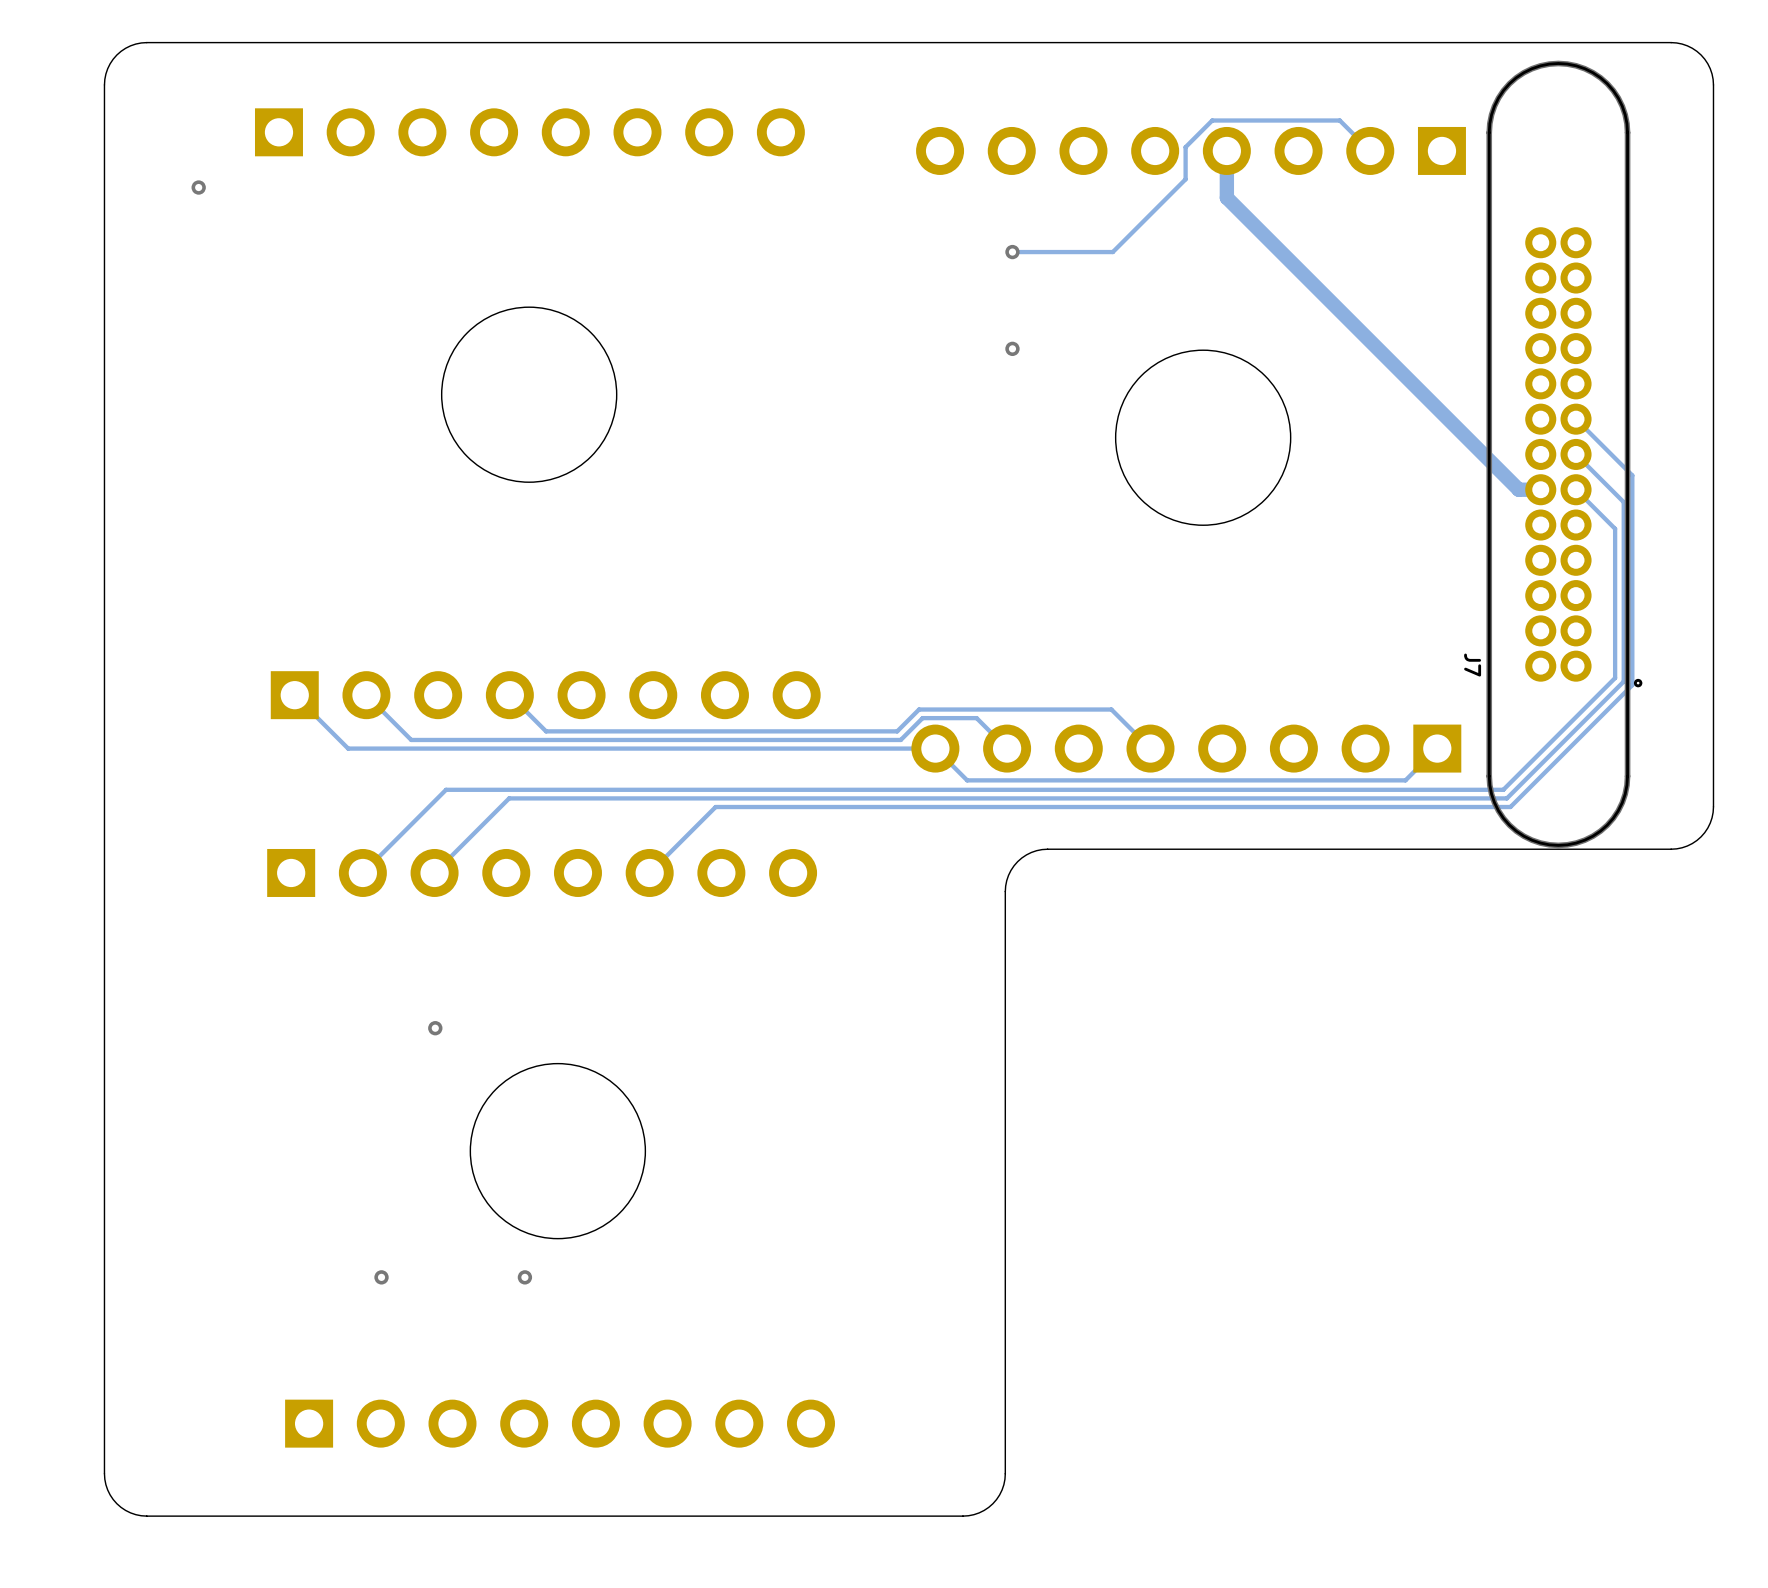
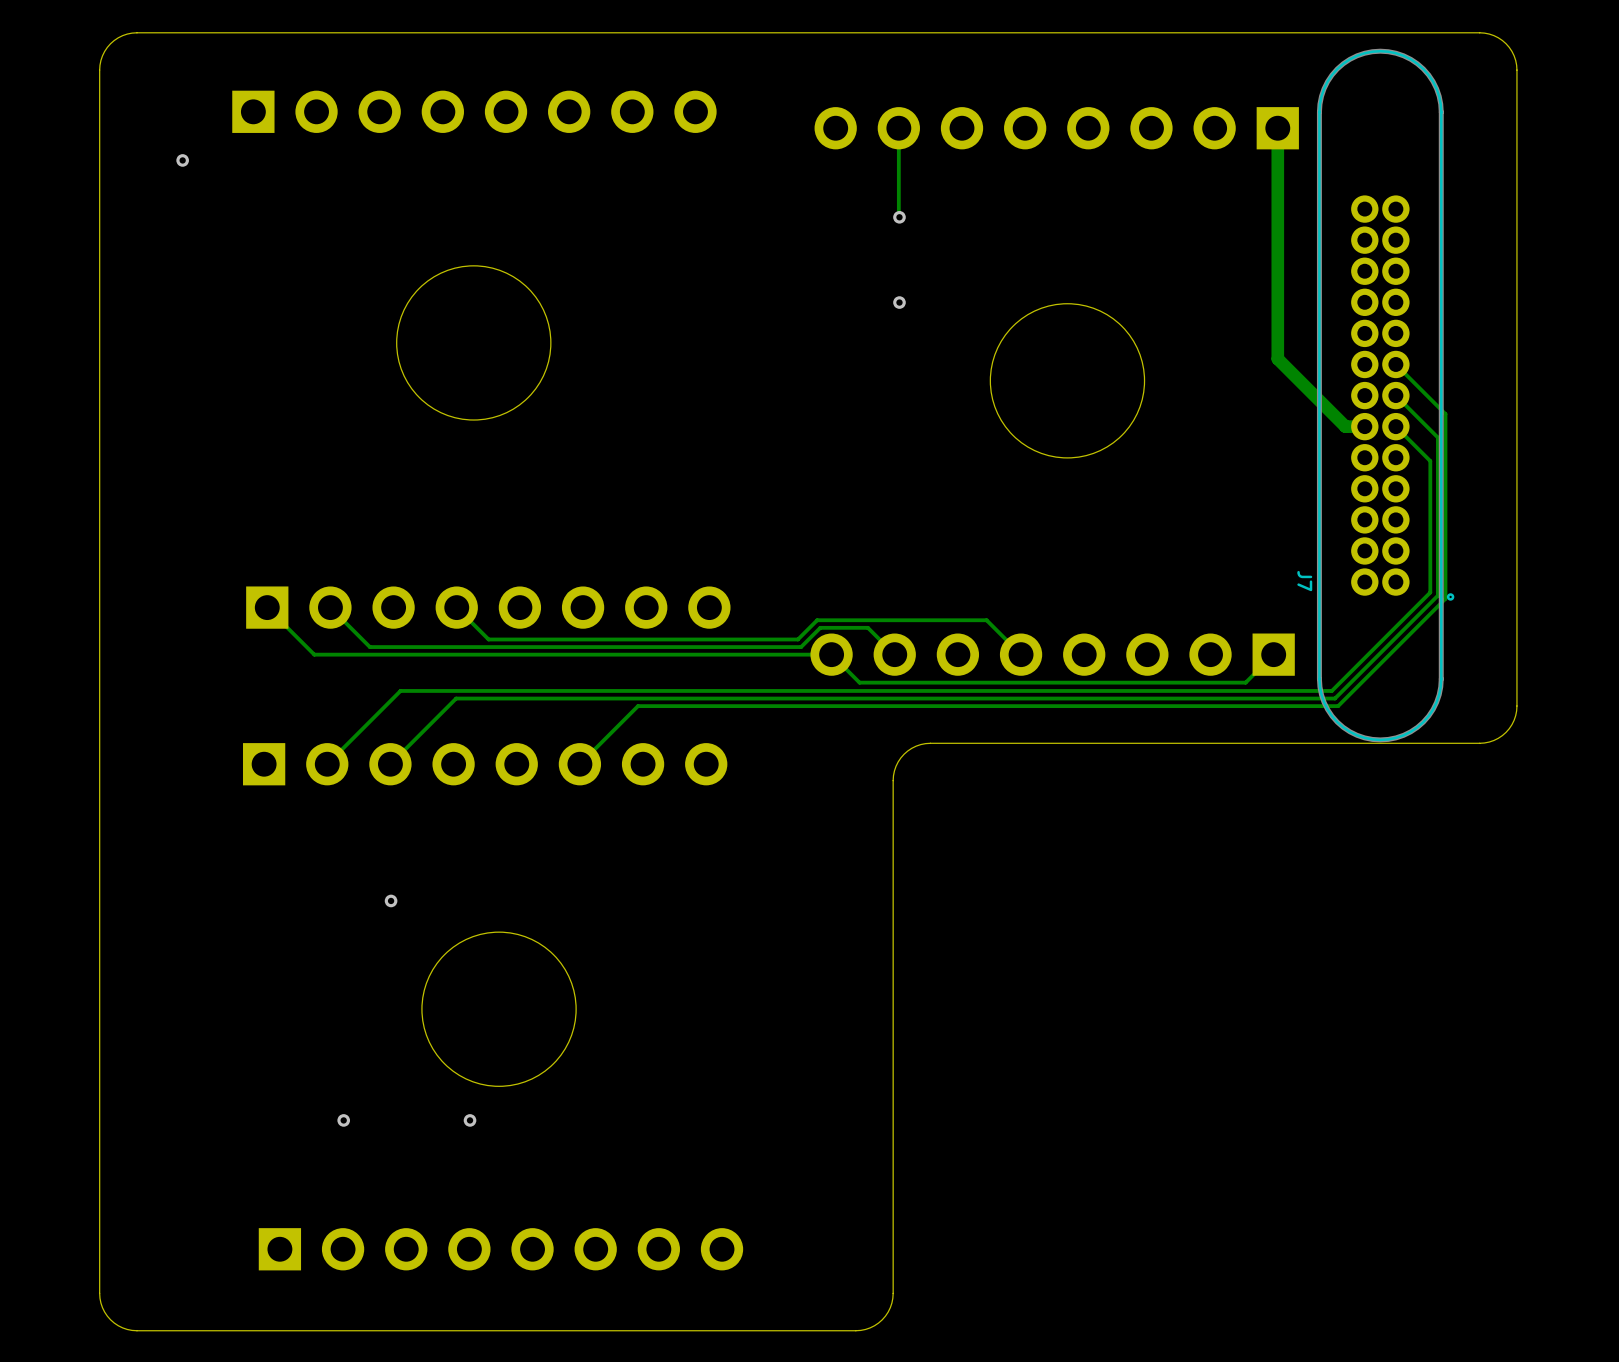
track: (1226, 150) (1226, 197) (1441, 412) -> (1277, 128) (1277, 358)
track: (1370, 150) (1339, 120) (1212, 120) (1185, 147) (1185, 179) (1112, 252) (1012, 252) -> (898, 128) (898, 216)

